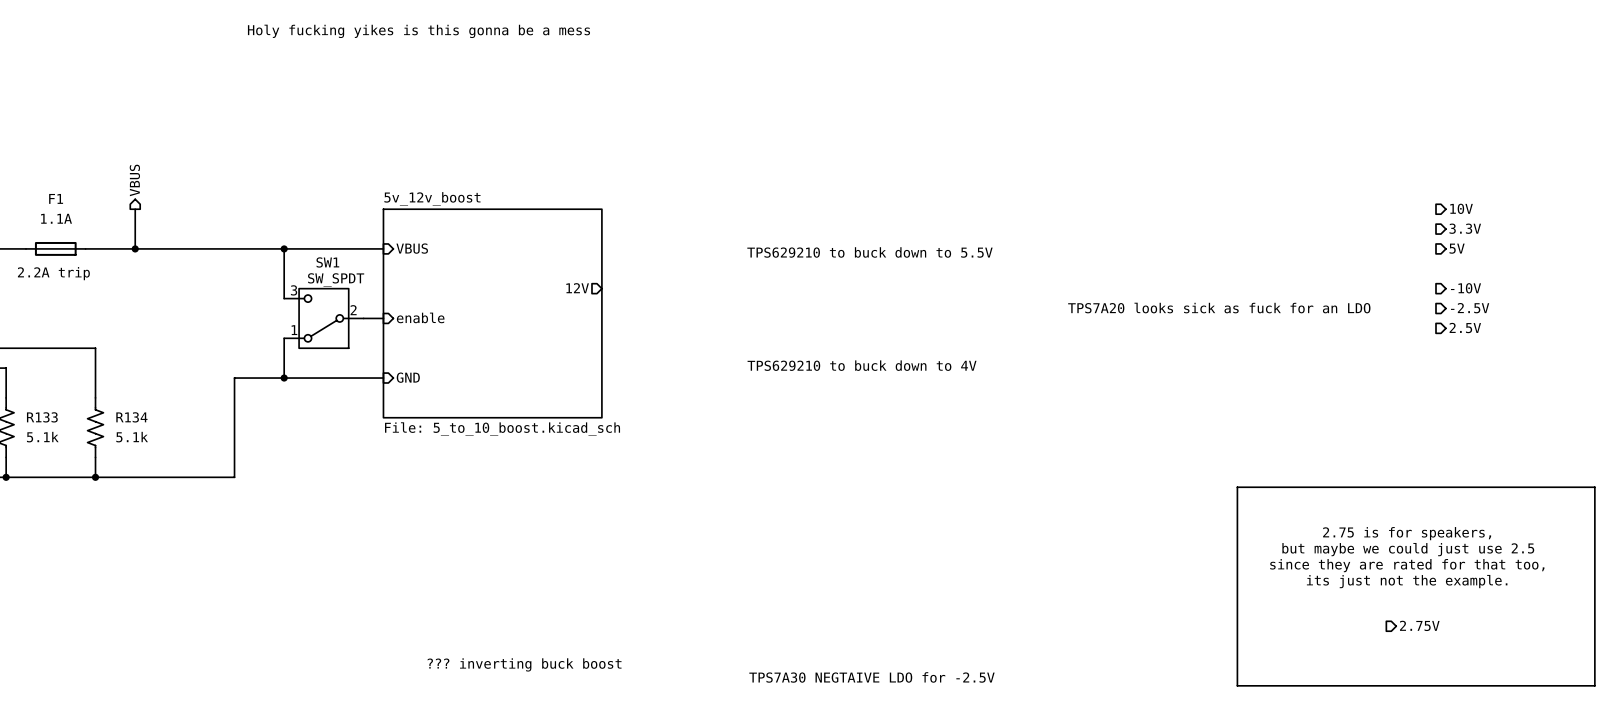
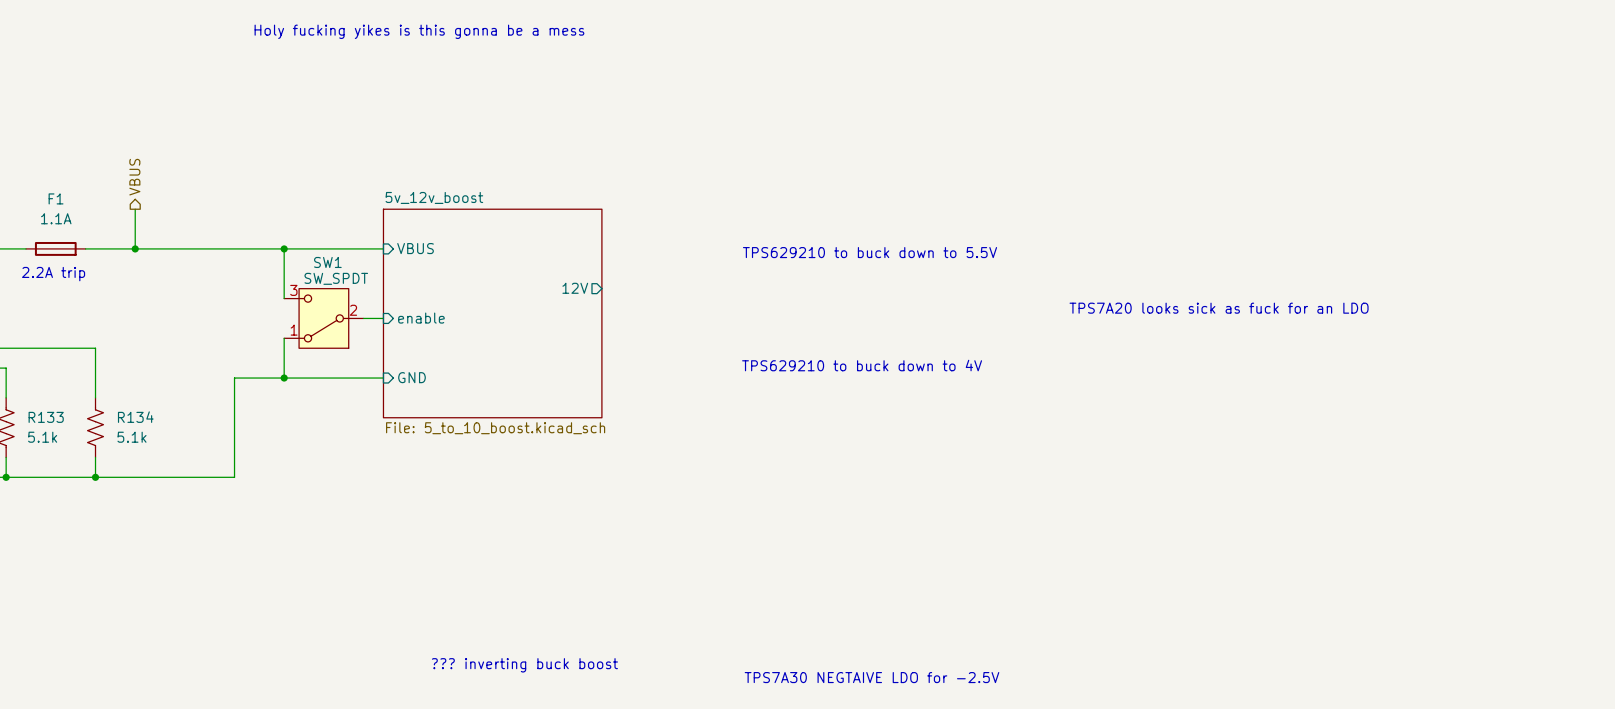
hierarchical label: 10V (1461, 208) -> none
hierarchical label: 3.3V (1465, 228) -> none
hierarchical label: 5V (1457, 248) -> none
hierarchical label: -10V (1466, 288) -> none
hierarchical label: -2.5V (1470, 308) -> none
hierarchical label: 2.5V (1465, 328) -> none
line: (1237, 487) (1594, 487) (1594, 685) (1237, 685) (1237, 487) -> none
text: 2.75 is for speakers, (1407, 533) -> none
text: but maybe we could just use 2.5 (1408, 549) -> none
text: since they are rated for that too, (1407, 565) -> none
text: its just not the example. (1407, 581) -> none
hierarchical label: 2.75V (1419, 625) -> none

